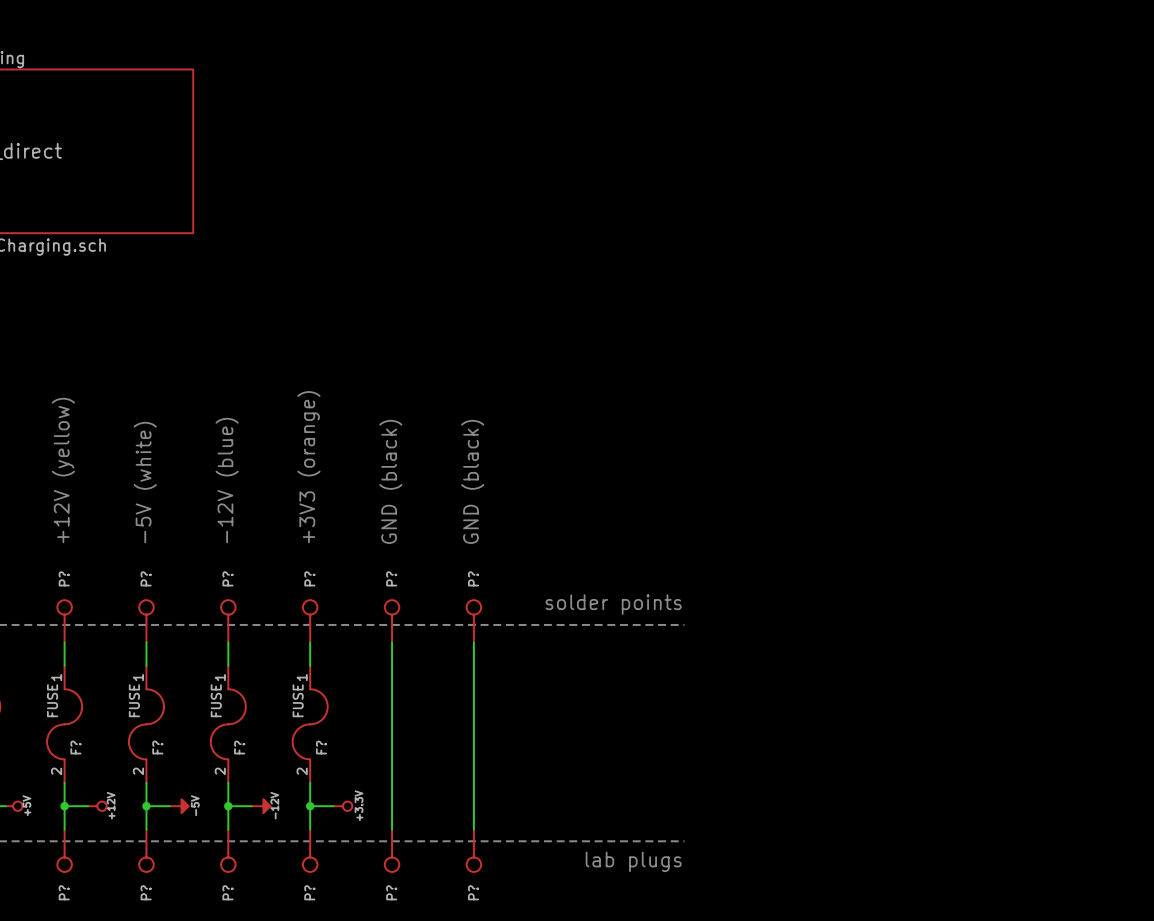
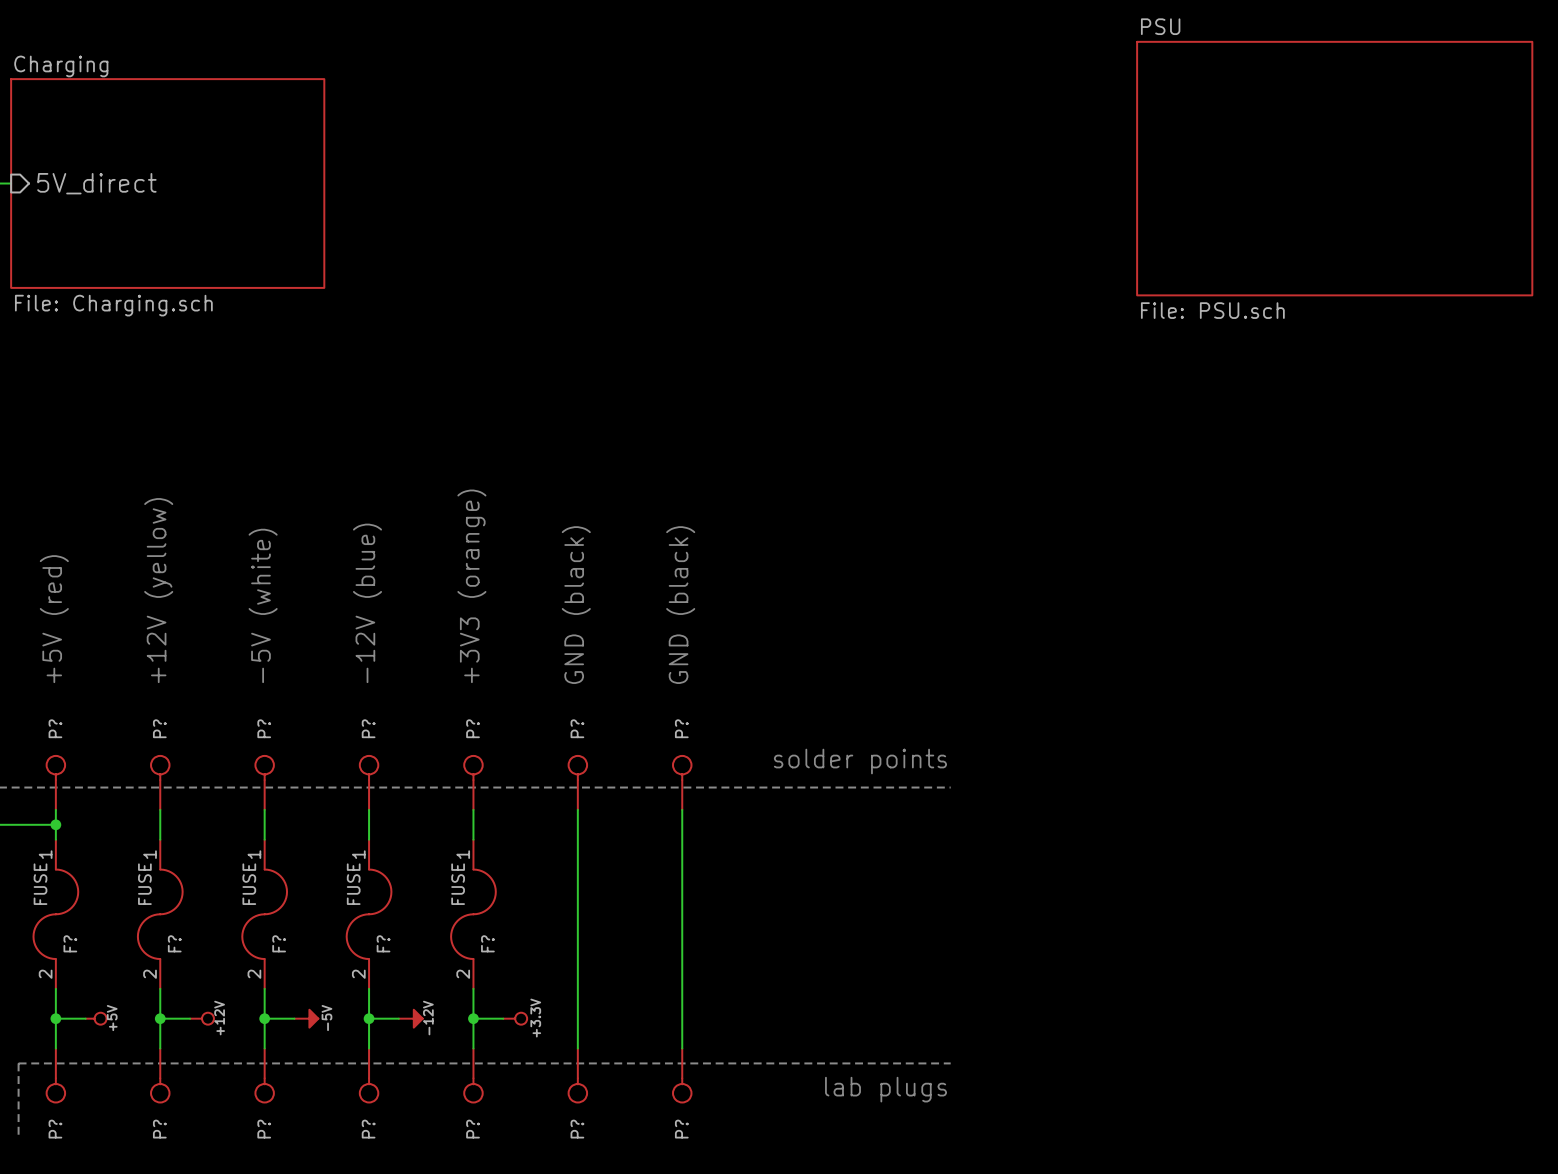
sheet PSU: none -> File: PSU.sch (1334, 168)

